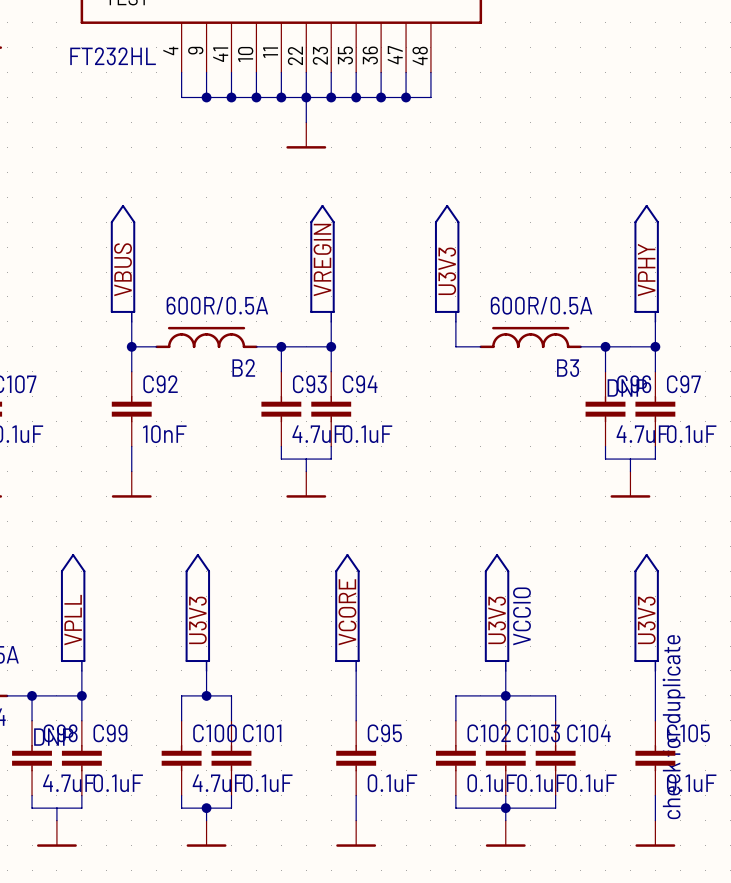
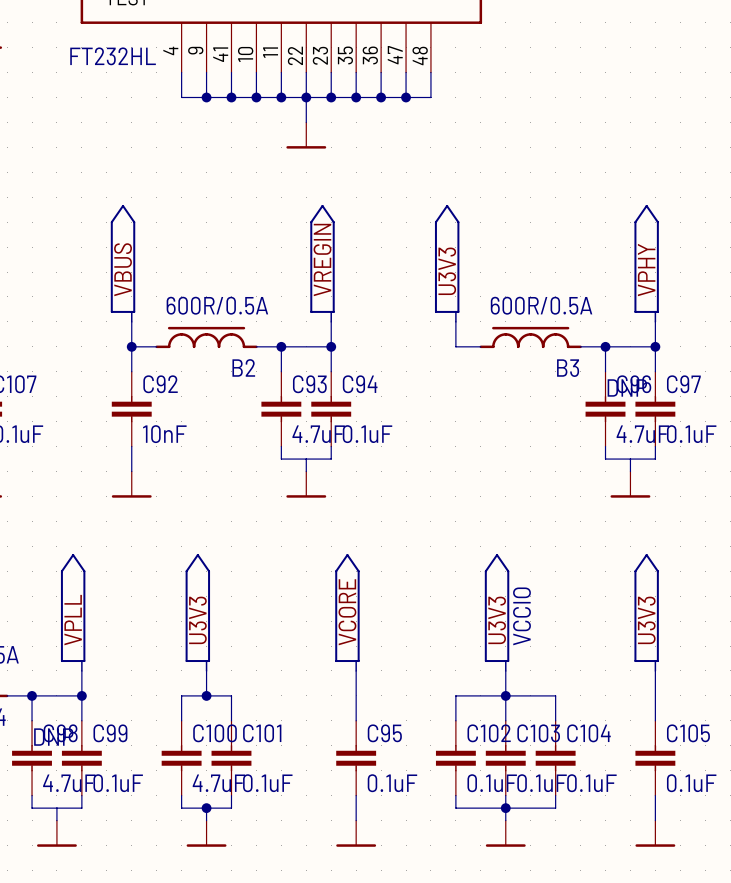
text: check for duplicate (673, 727) -> none

